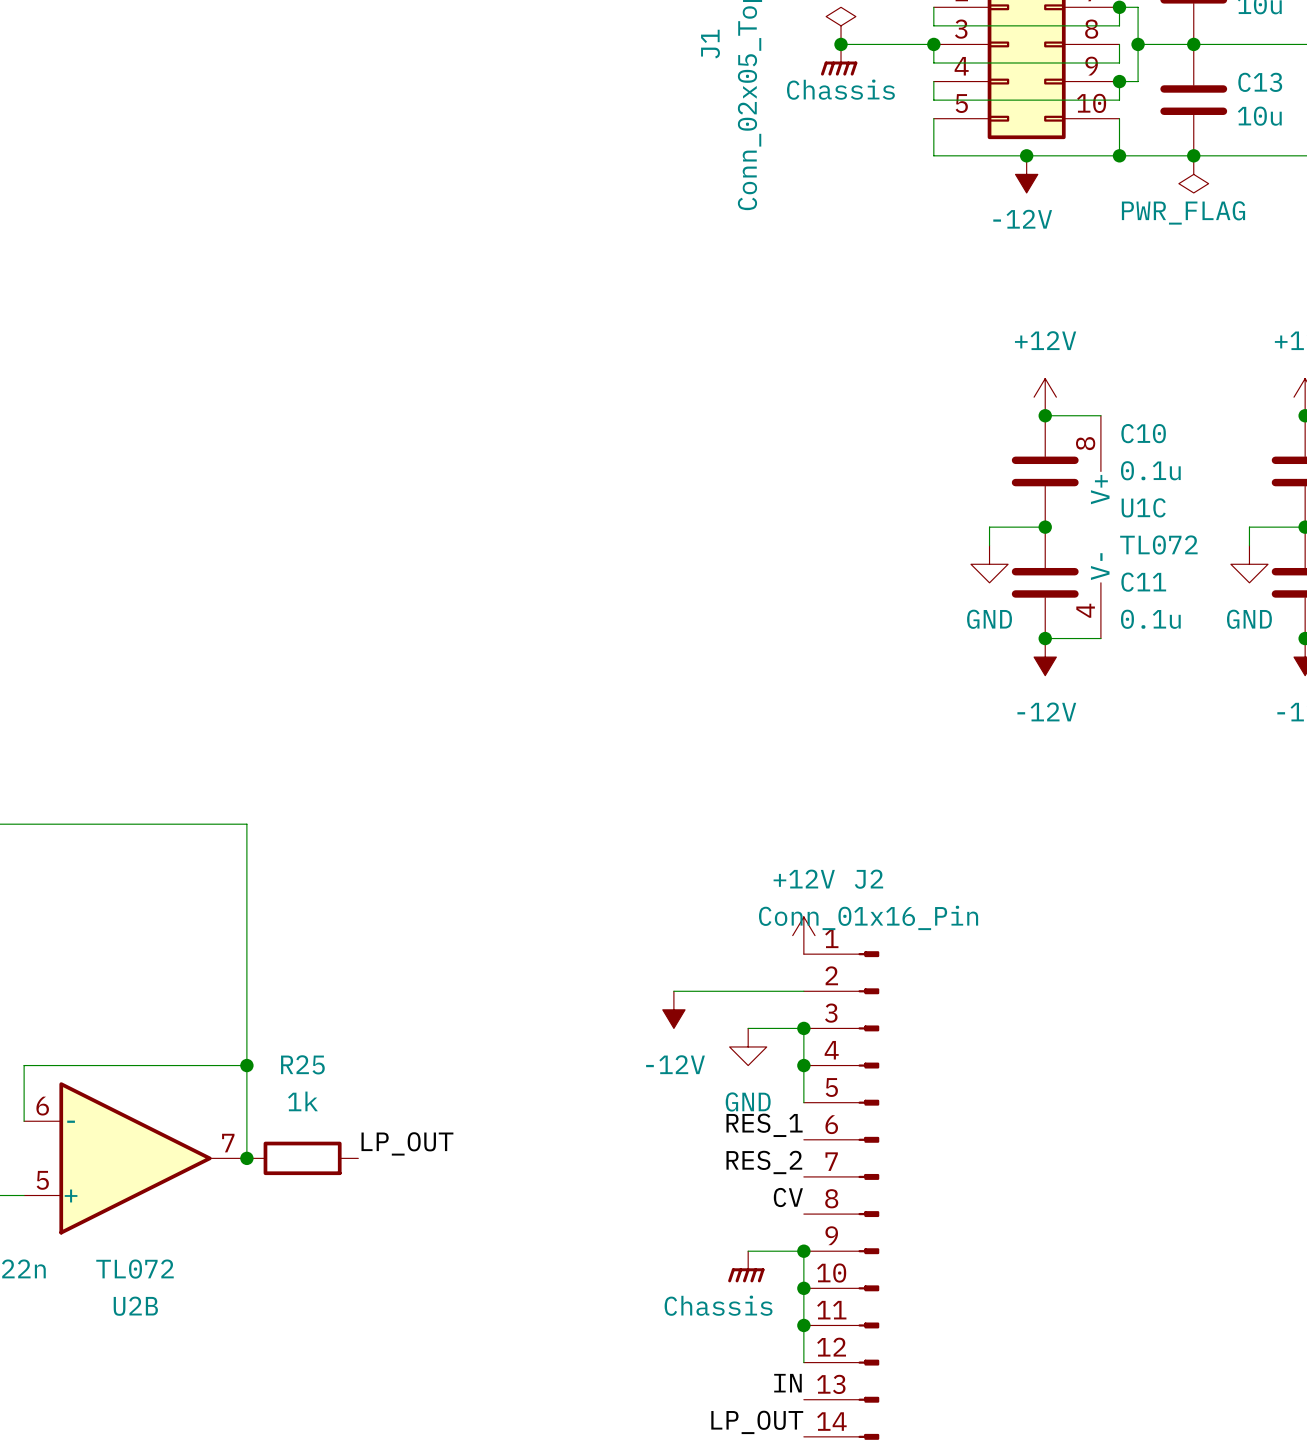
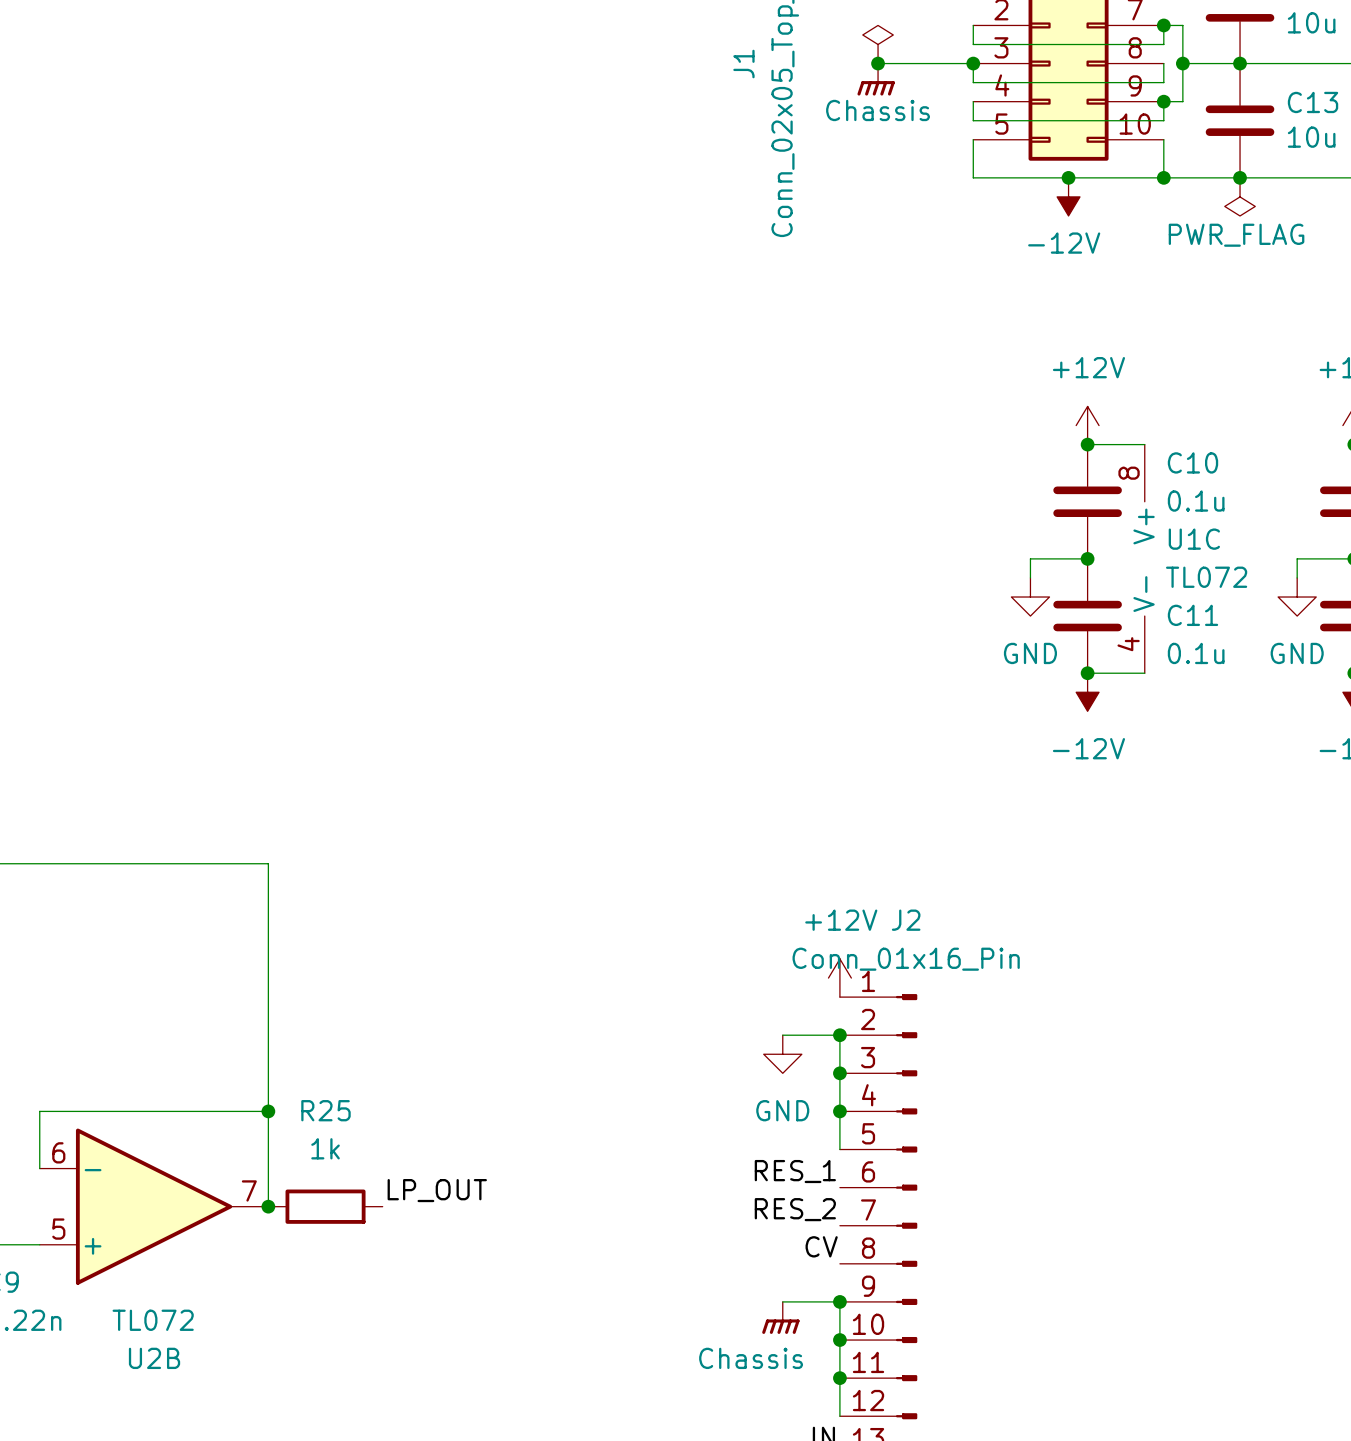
wire: (673, 991) (748, 991) -> none
junction: none -> (839, 1035)
power symbol: -12V (673, 1009) -> none
wire: (748, 1028) (803, 1028) -> (839, 1035) (839, 1073)
power symbol position: GND (748, 1046) -> GND (782, 1054)

